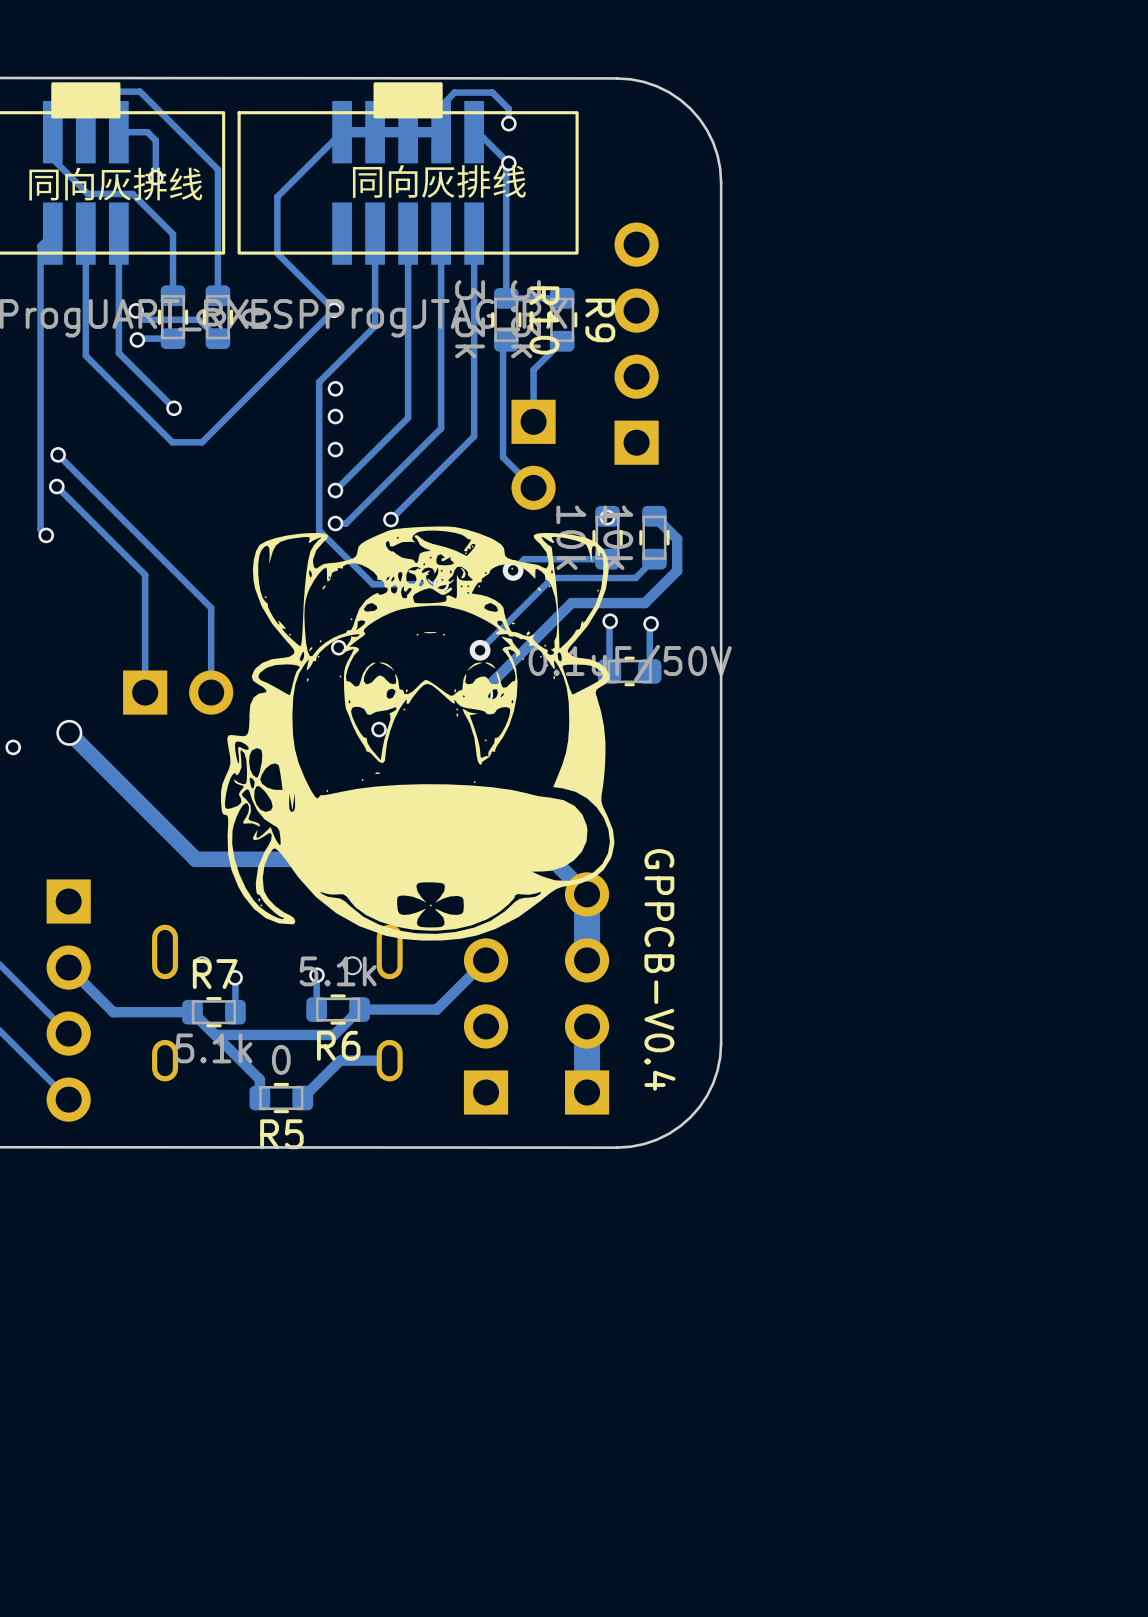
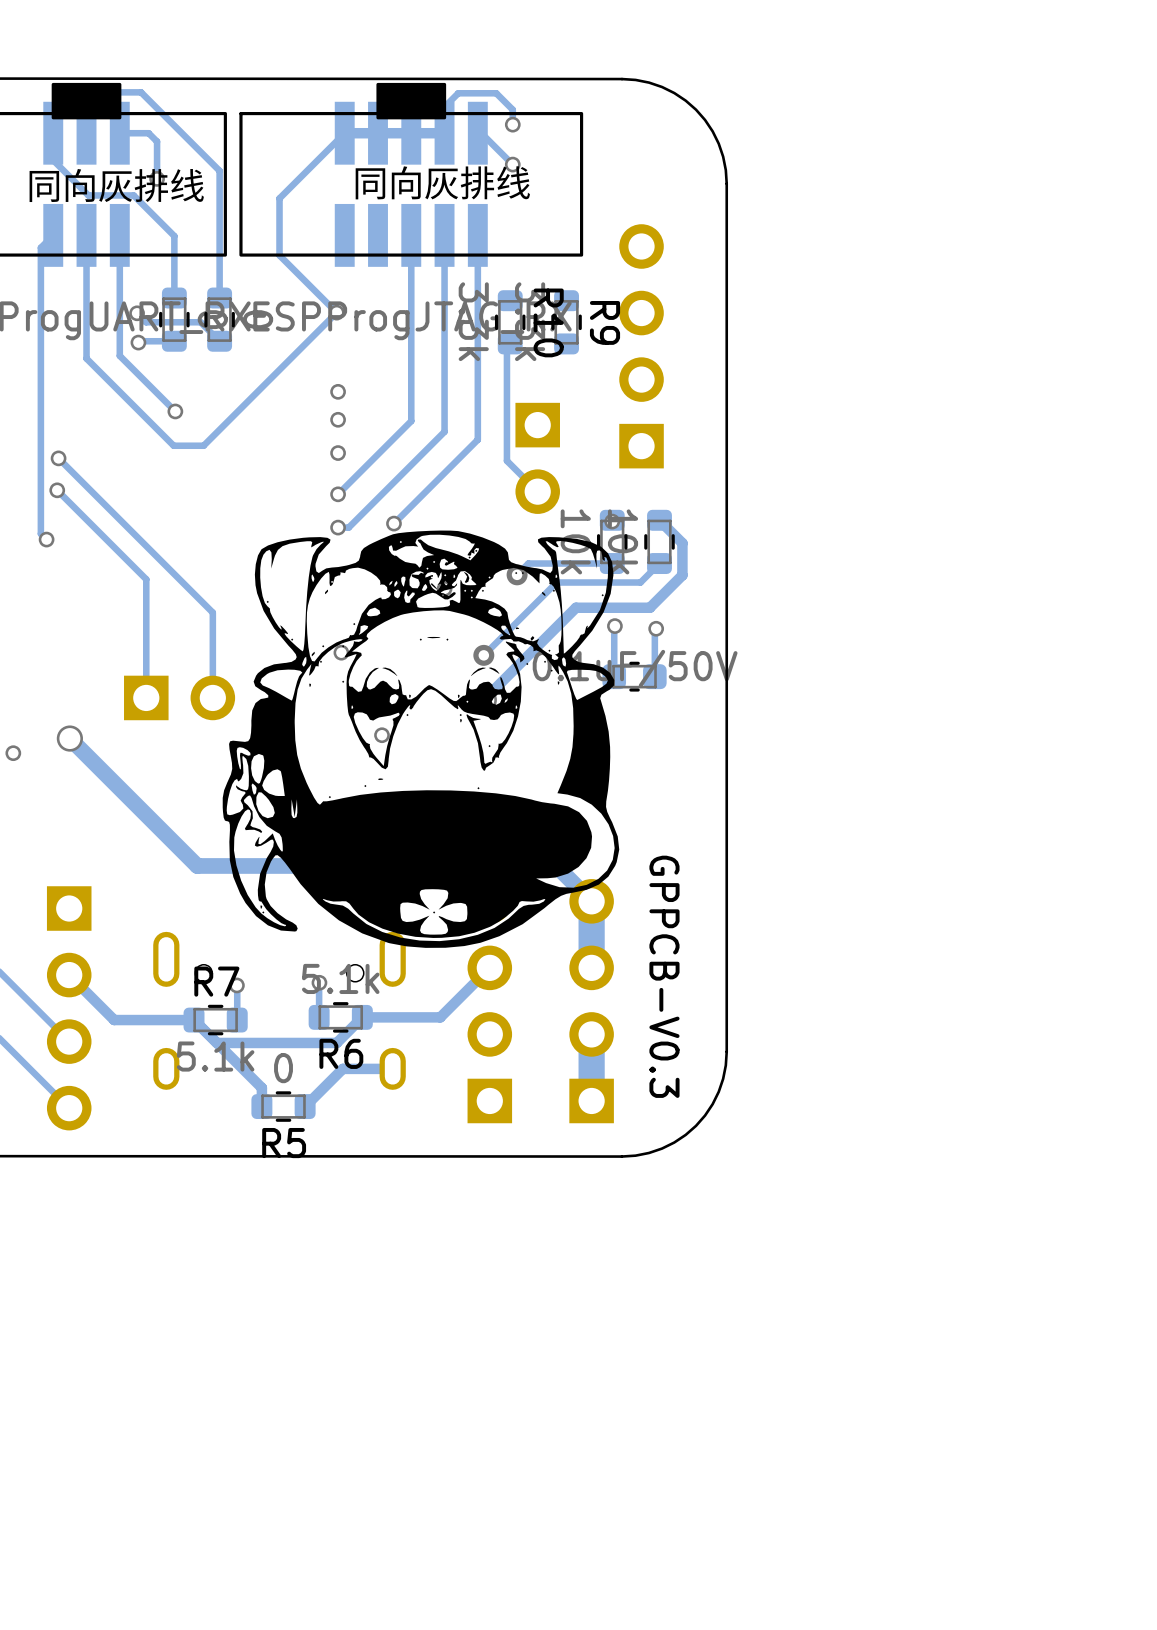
track: (508, 163) (506, 165) (506, 298) (562, 298) -> none
track: (375, 233) (375, 326) (319, 382) (319, 530) (372, 584) (441, 584) -> none
track: (562, 341) (533, 369) (533, 421) -> none
text: GPPCB-V0.4 (659, 969) -> GPPCB-V0.3 (664, 976)

